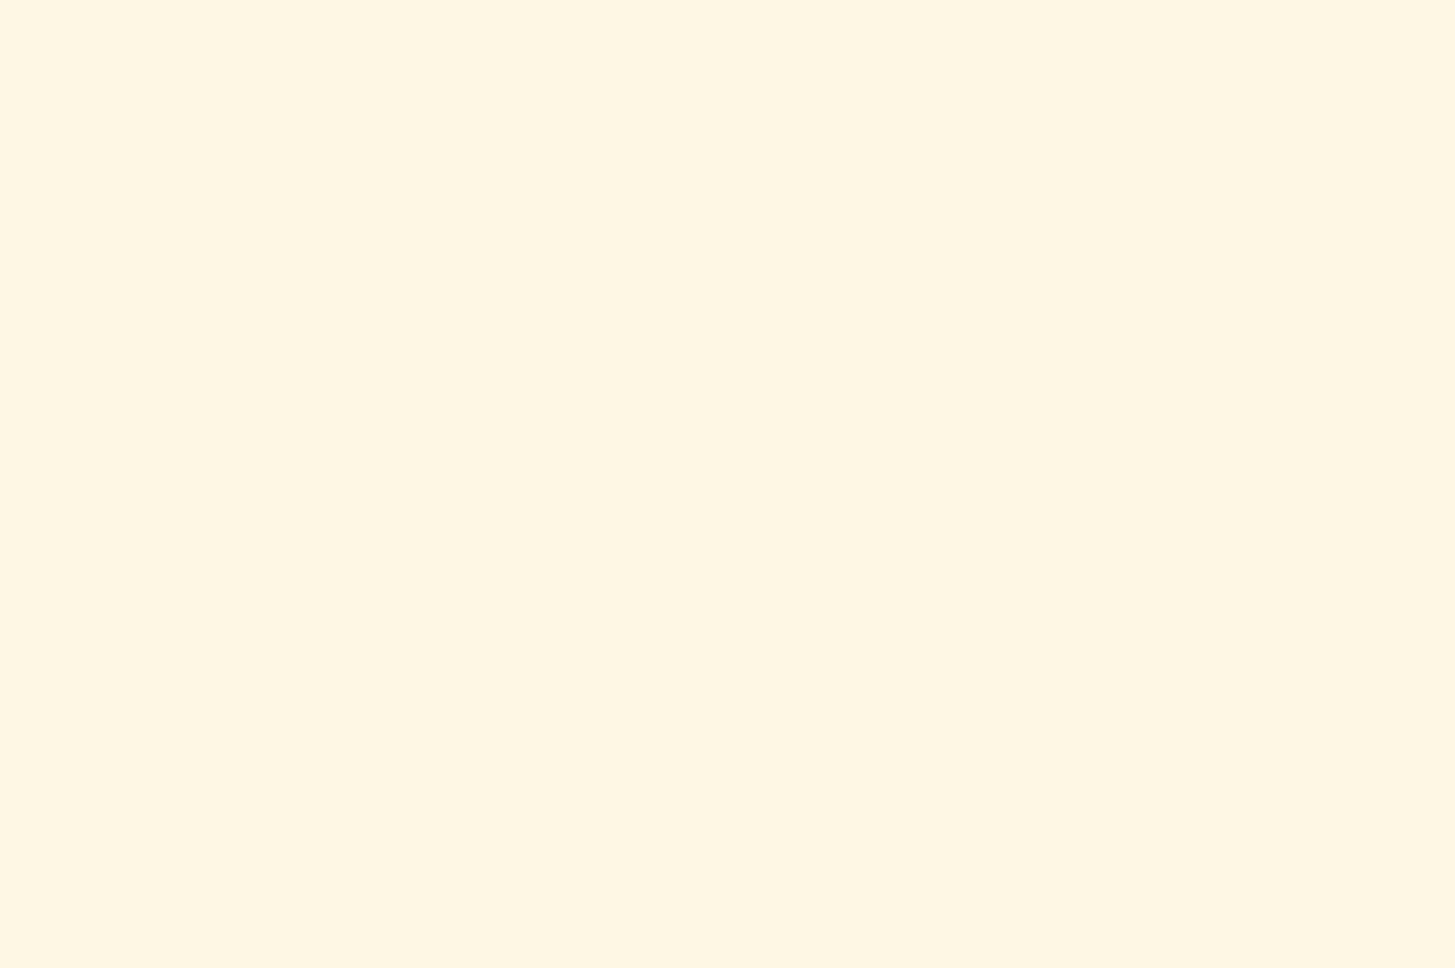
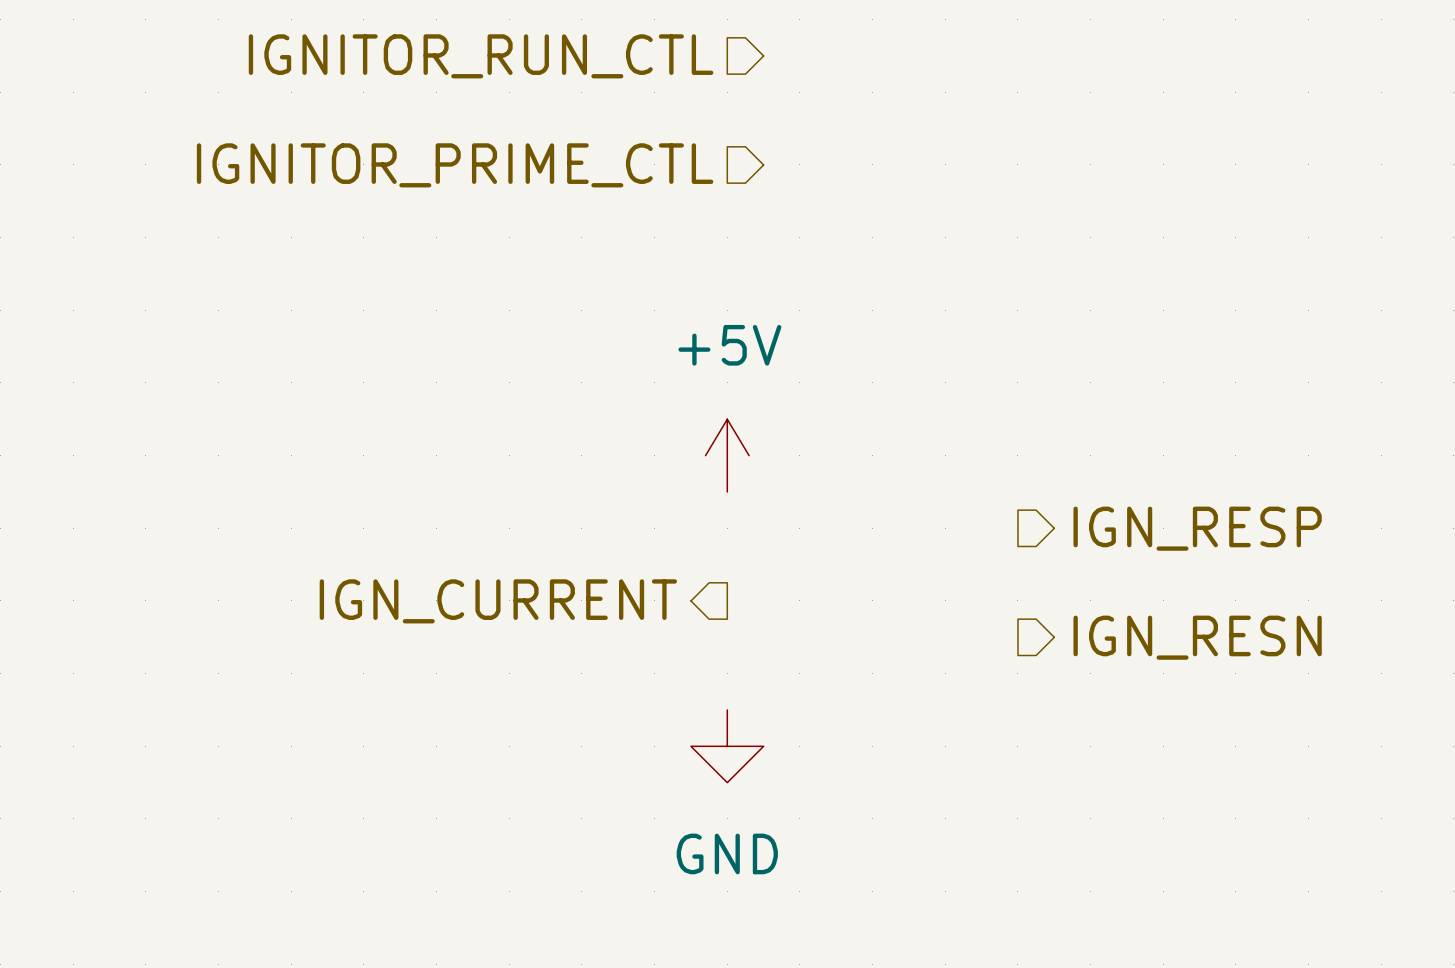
hierarchical label: none -> IGNITOR_RUN_CTL (481, 56)
hierarchical label: none -> IGNITOR_PRIME_CTL (455, 165)
power symbol: none -> +5V (727, 455)
hierarchical label: none -> IGN_RESP (1197, 528)
hierarchical label: none -> IGN_CURRENT (498, 601)
hierarchical label: none -> IGN_RESN (1197, 637)
power symbol: none -> GND (727, 746)

